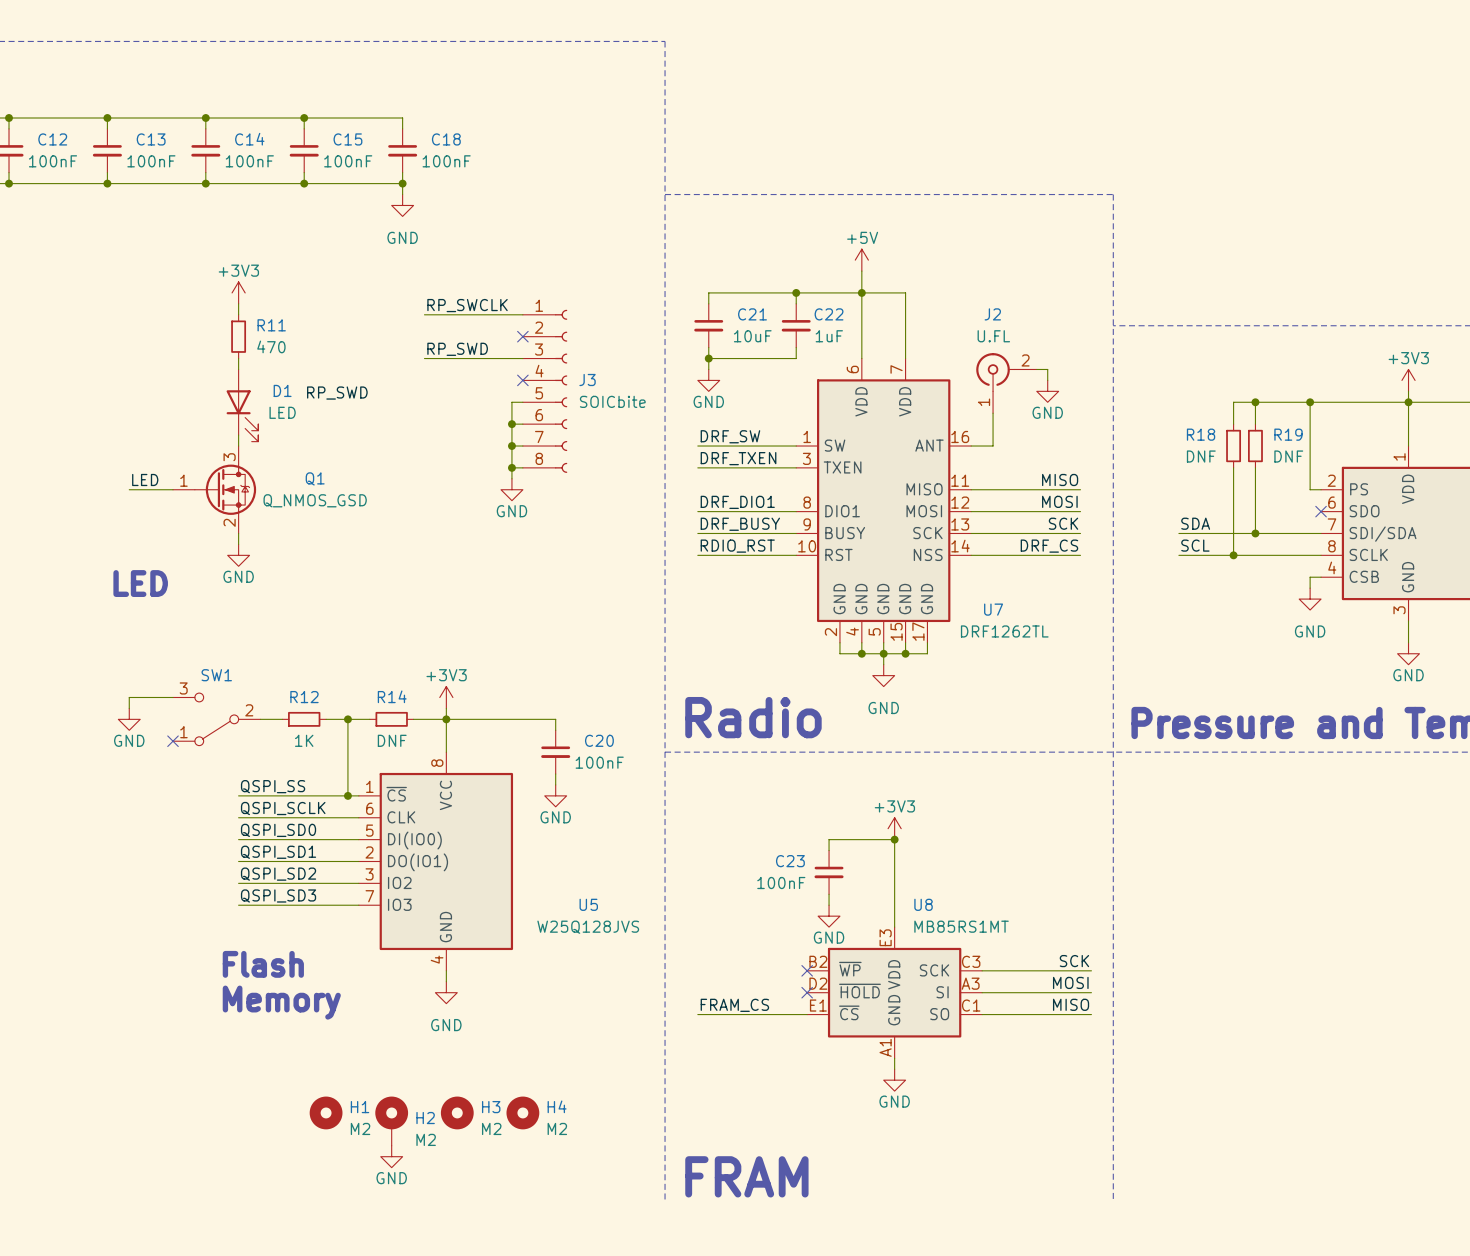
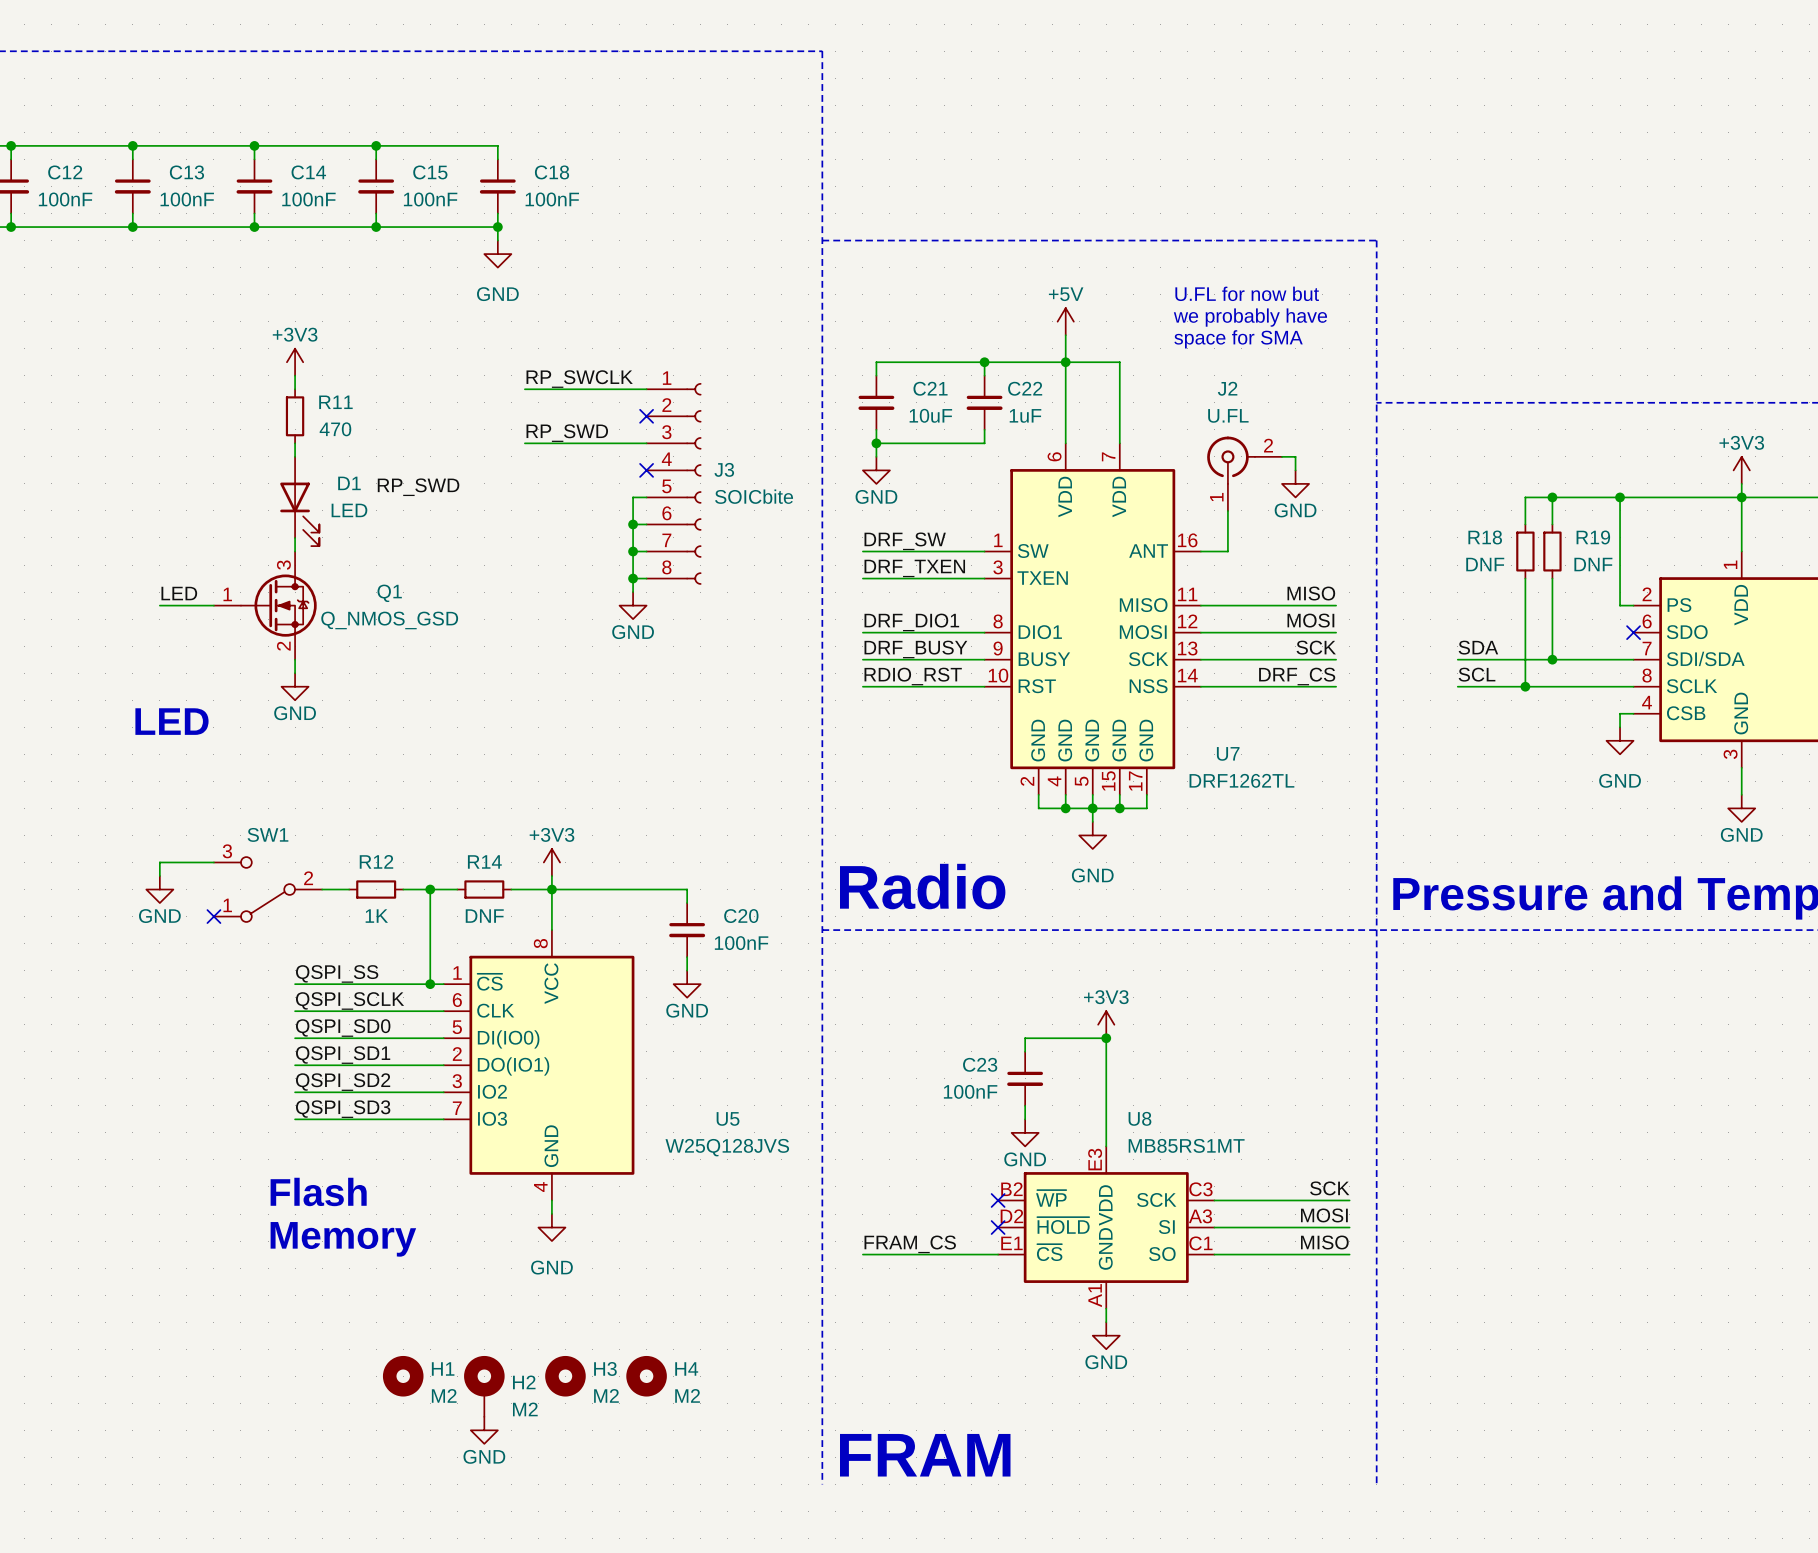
text: none -> U.FL for now but (1247, 293)
text: none -> we probably have (1250, 317)
text: none -> space for SMA (1238, 339)

